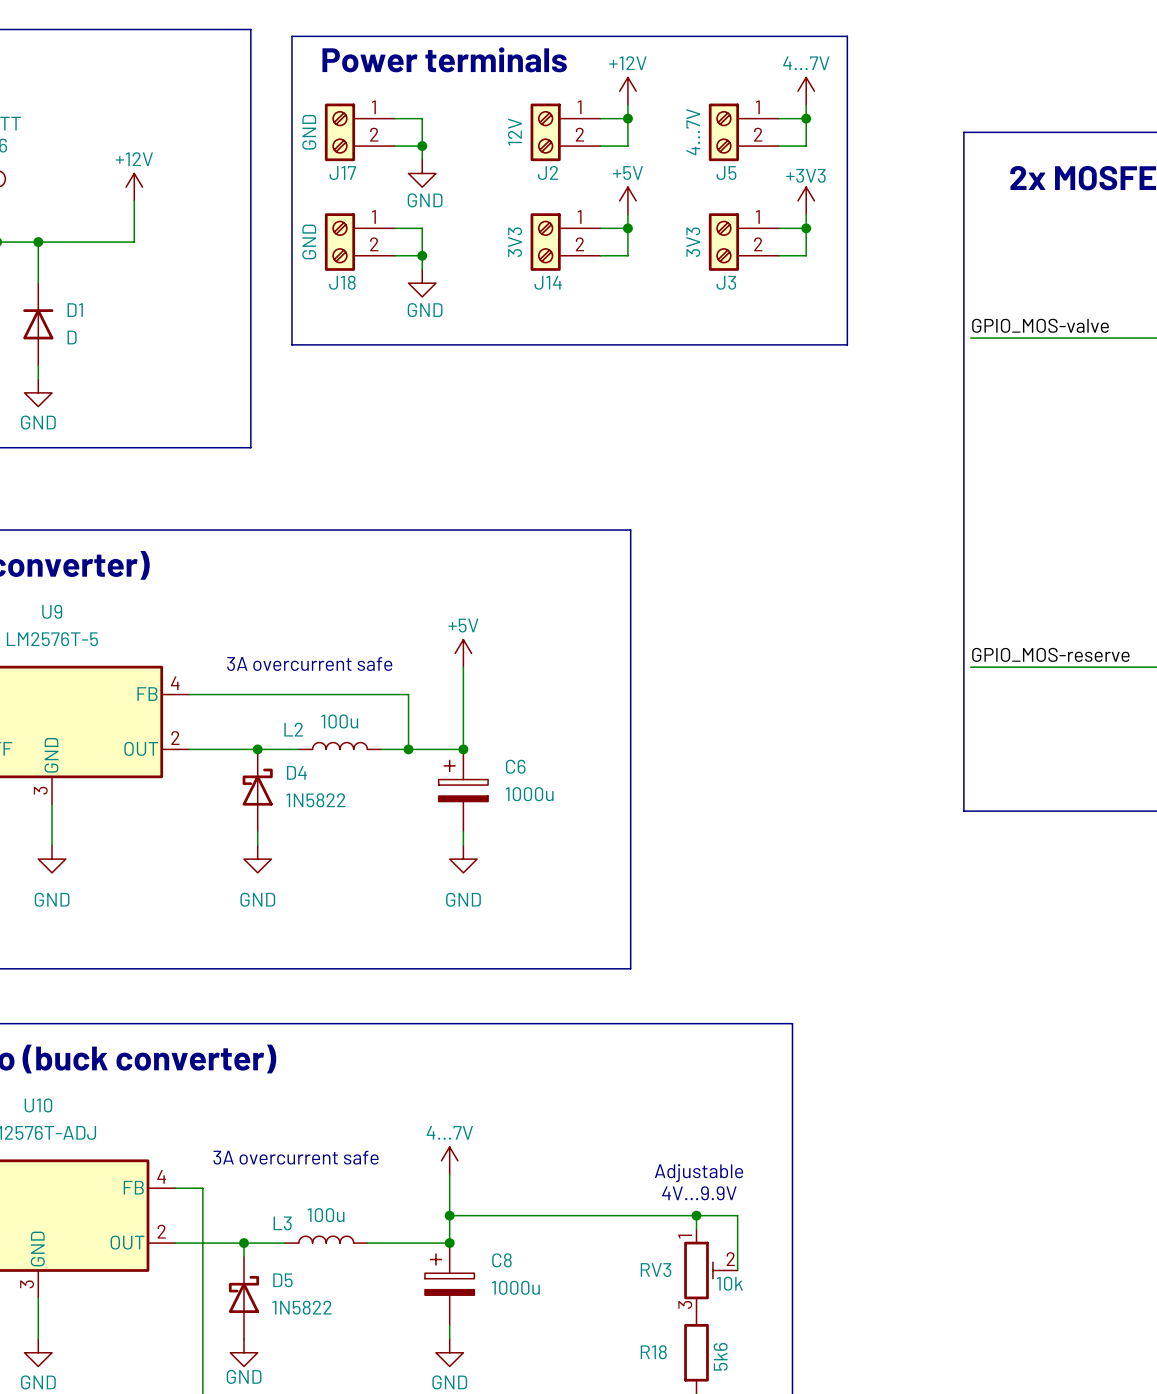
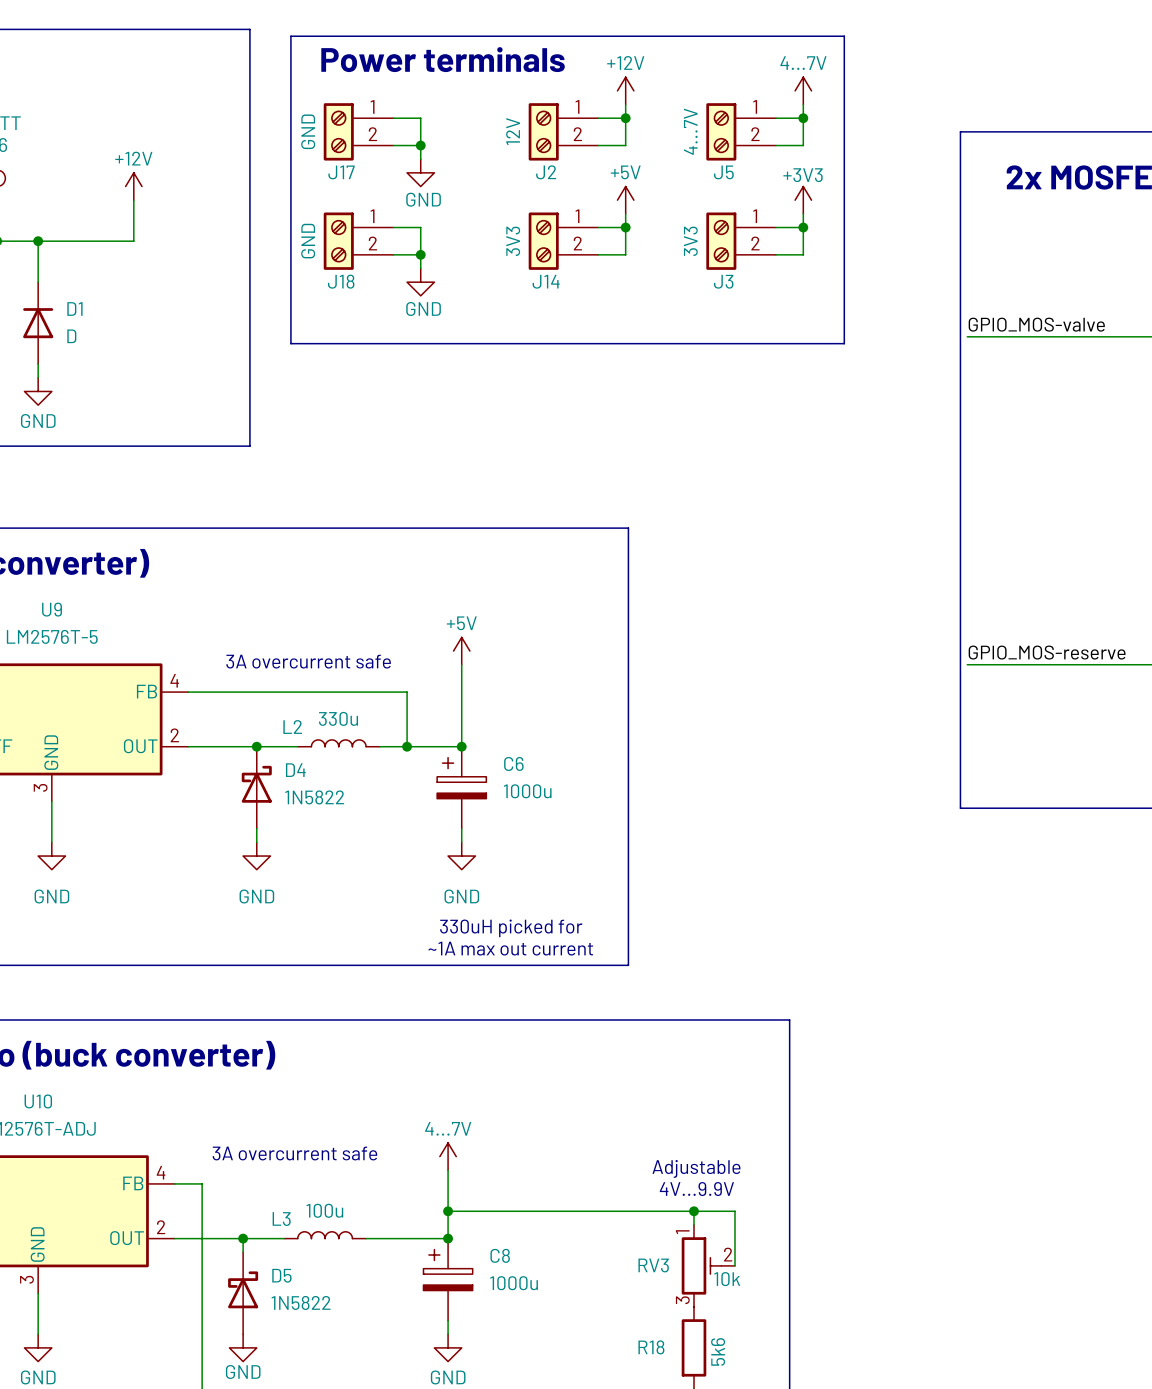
L2 value: 100u (339, 721) -> 330u (338, 718)
text: none -> 330uH picked for (511, 928)
text: none -> ~1A max out current (510, 948)

